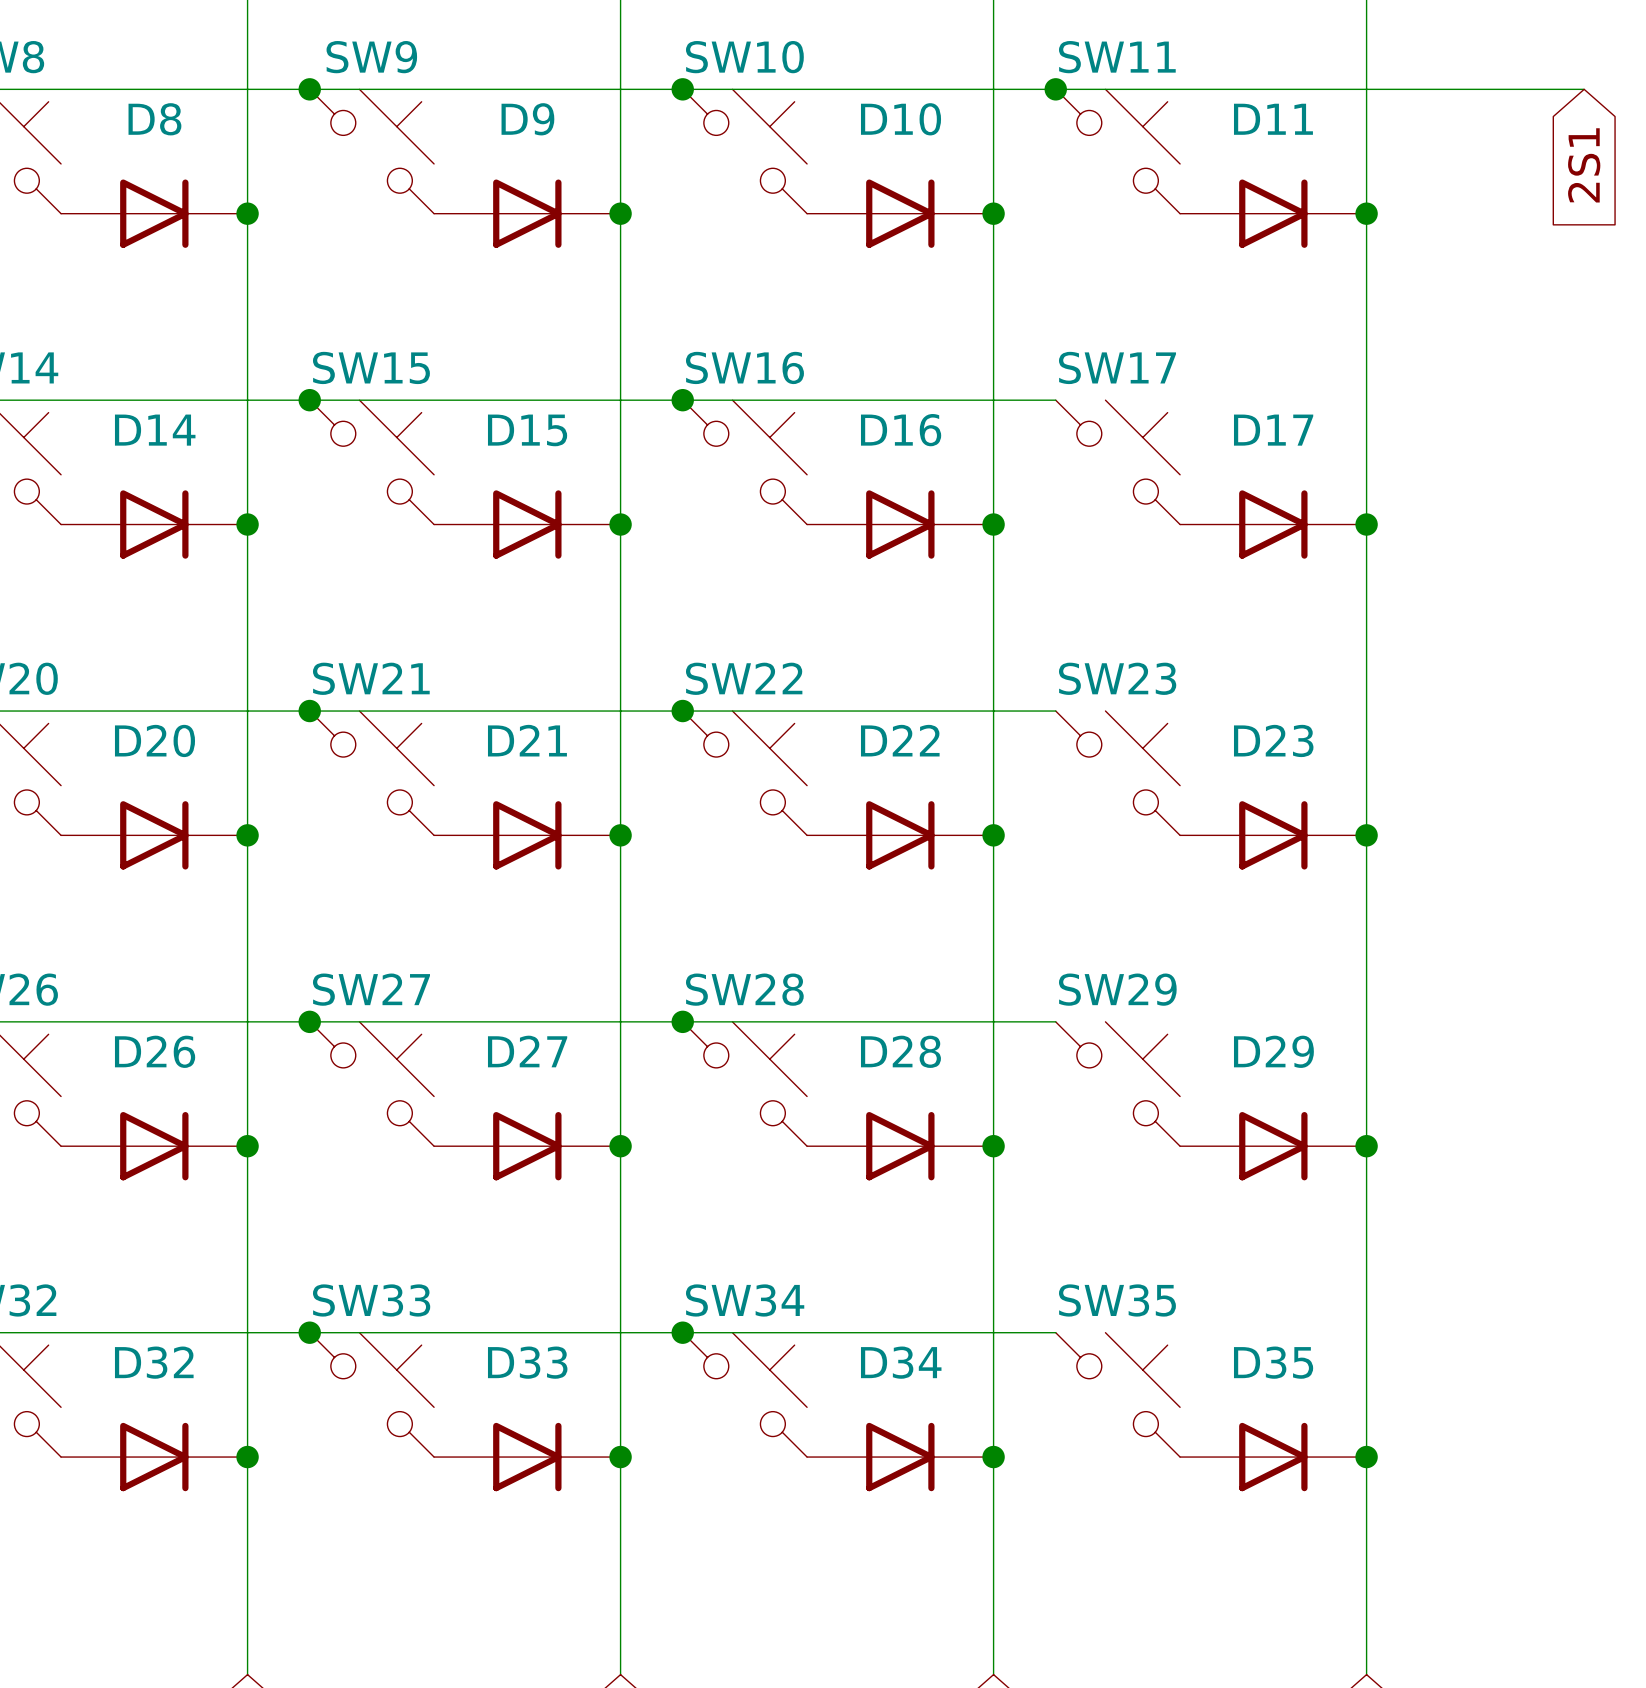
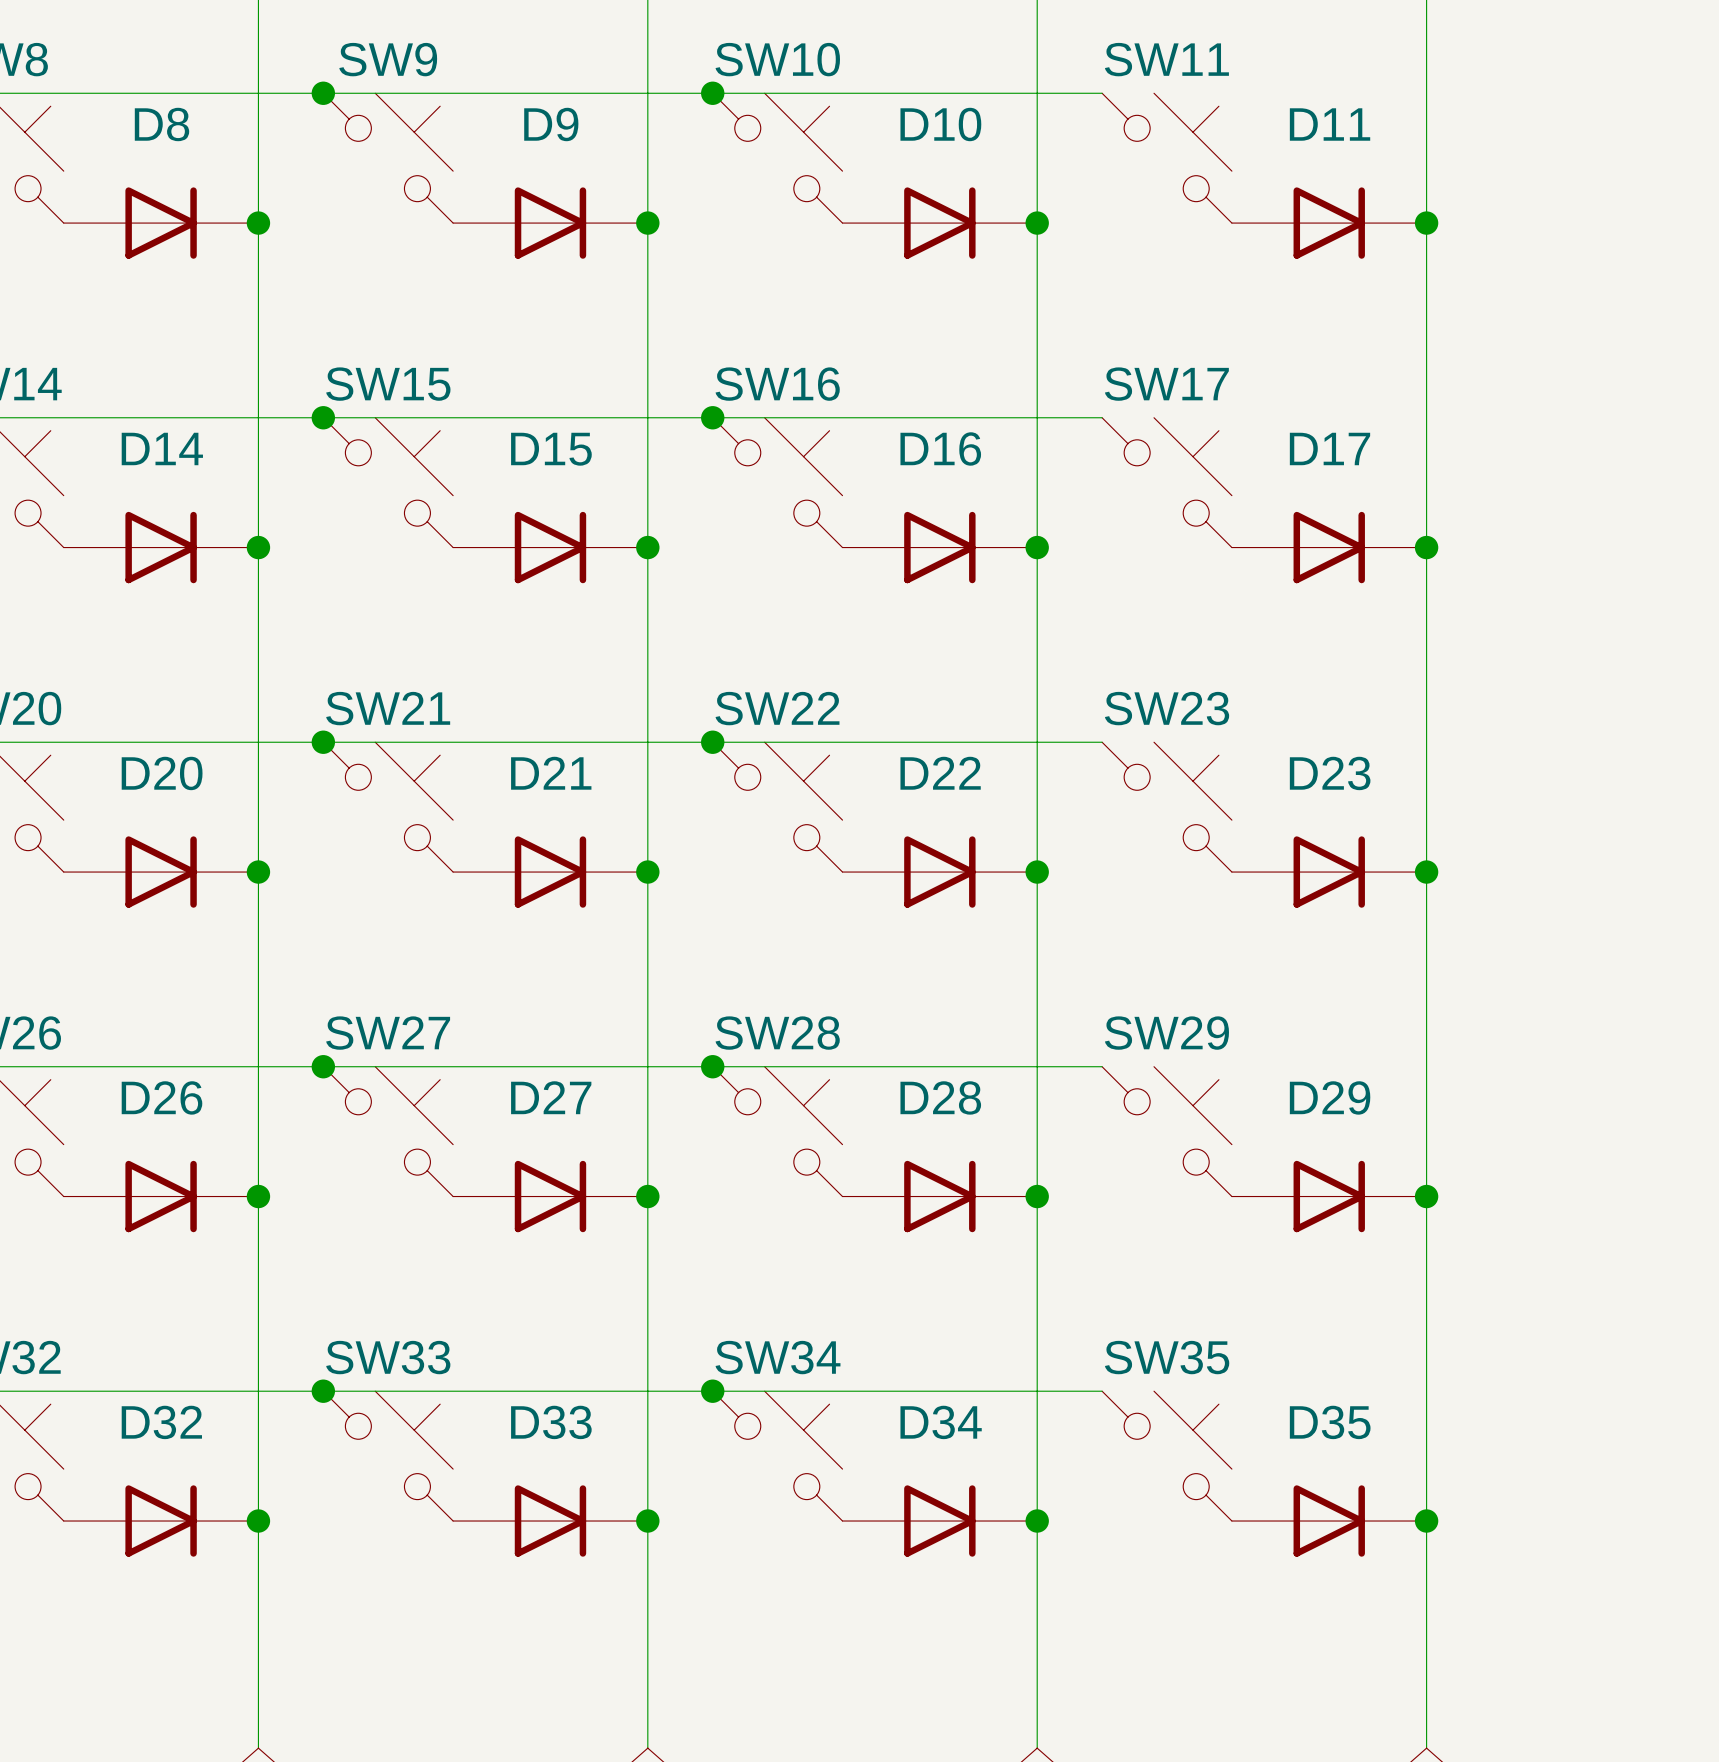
wire: (1055, 89) (1584, 89) -> none
junction: (1055, 89) -> none
global label: 2S1 (1584, 165) -> none

